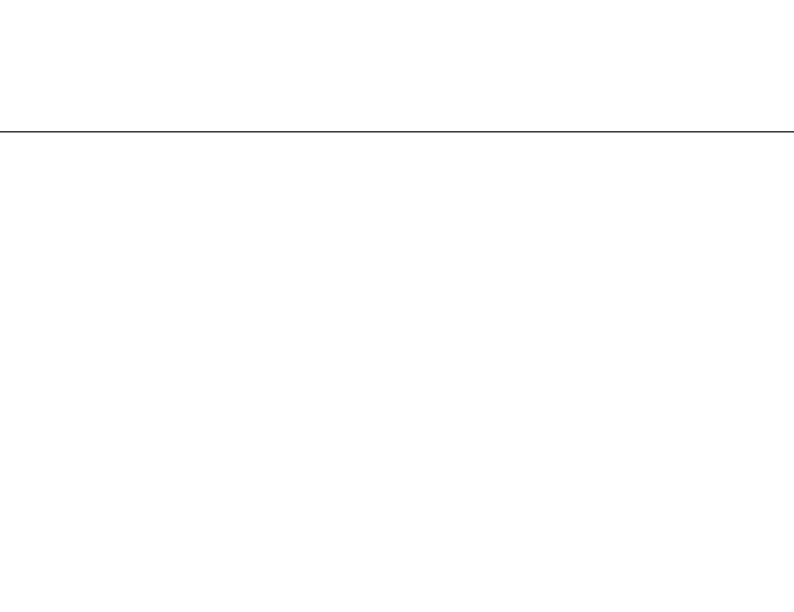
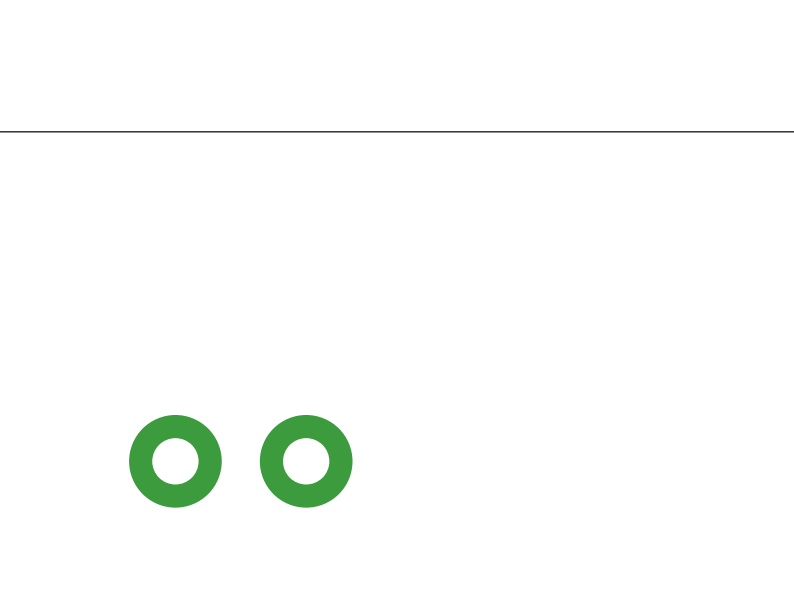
part: none -> (240, 461)

